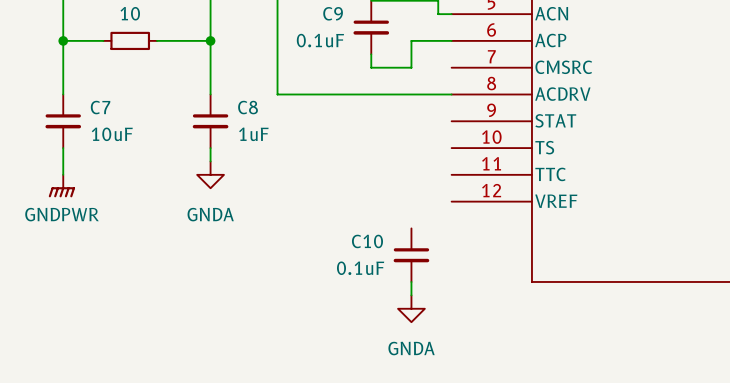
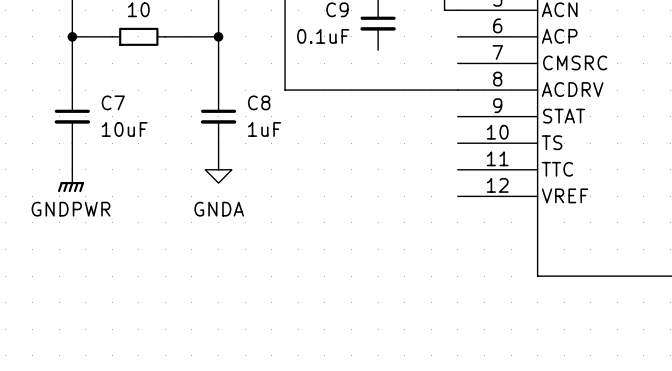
wire: (451, 40) (411, 40) (411, 67) (371, 67) (371, 54) -> none
C10: 0.1uF (411, 255) -> none
wire: (411, 281) (411, 295) -> none
power symbol: GNDA (411, 308) -> none

